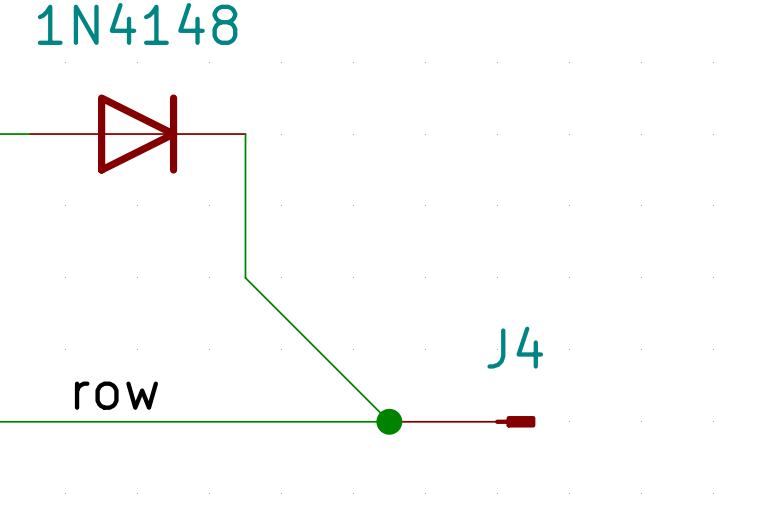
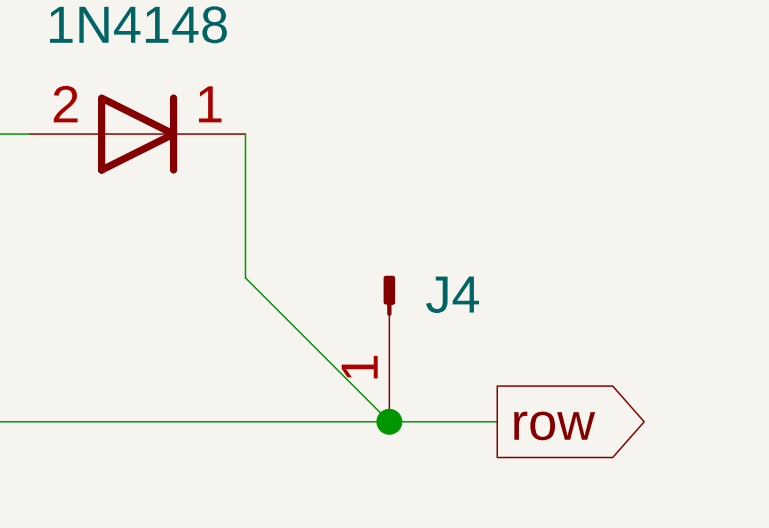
part pin number: none -> 2 (65, 104)
part pin number: none -> 1 (210, 104)
label: row (116, 395) -> none
J4 symbol: [389, 416, 536, 428] -> [383, 275, 396, 422]
global label: none -> row (554, 425)

